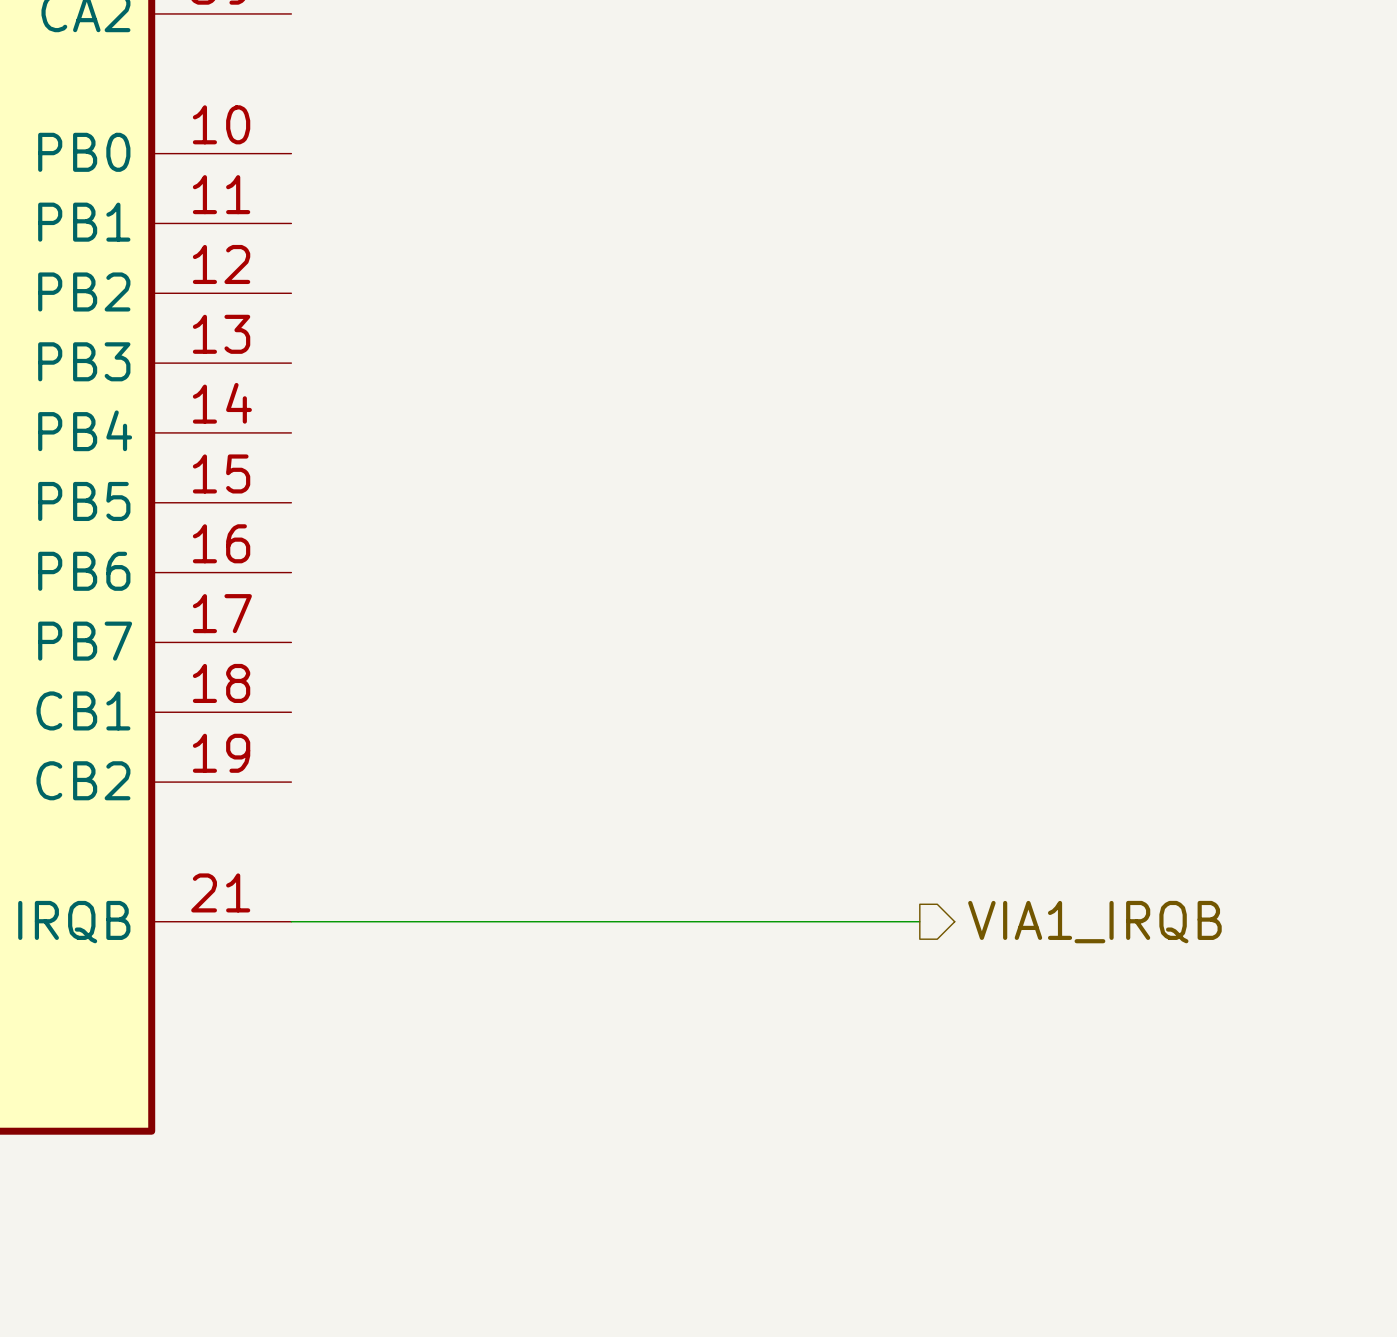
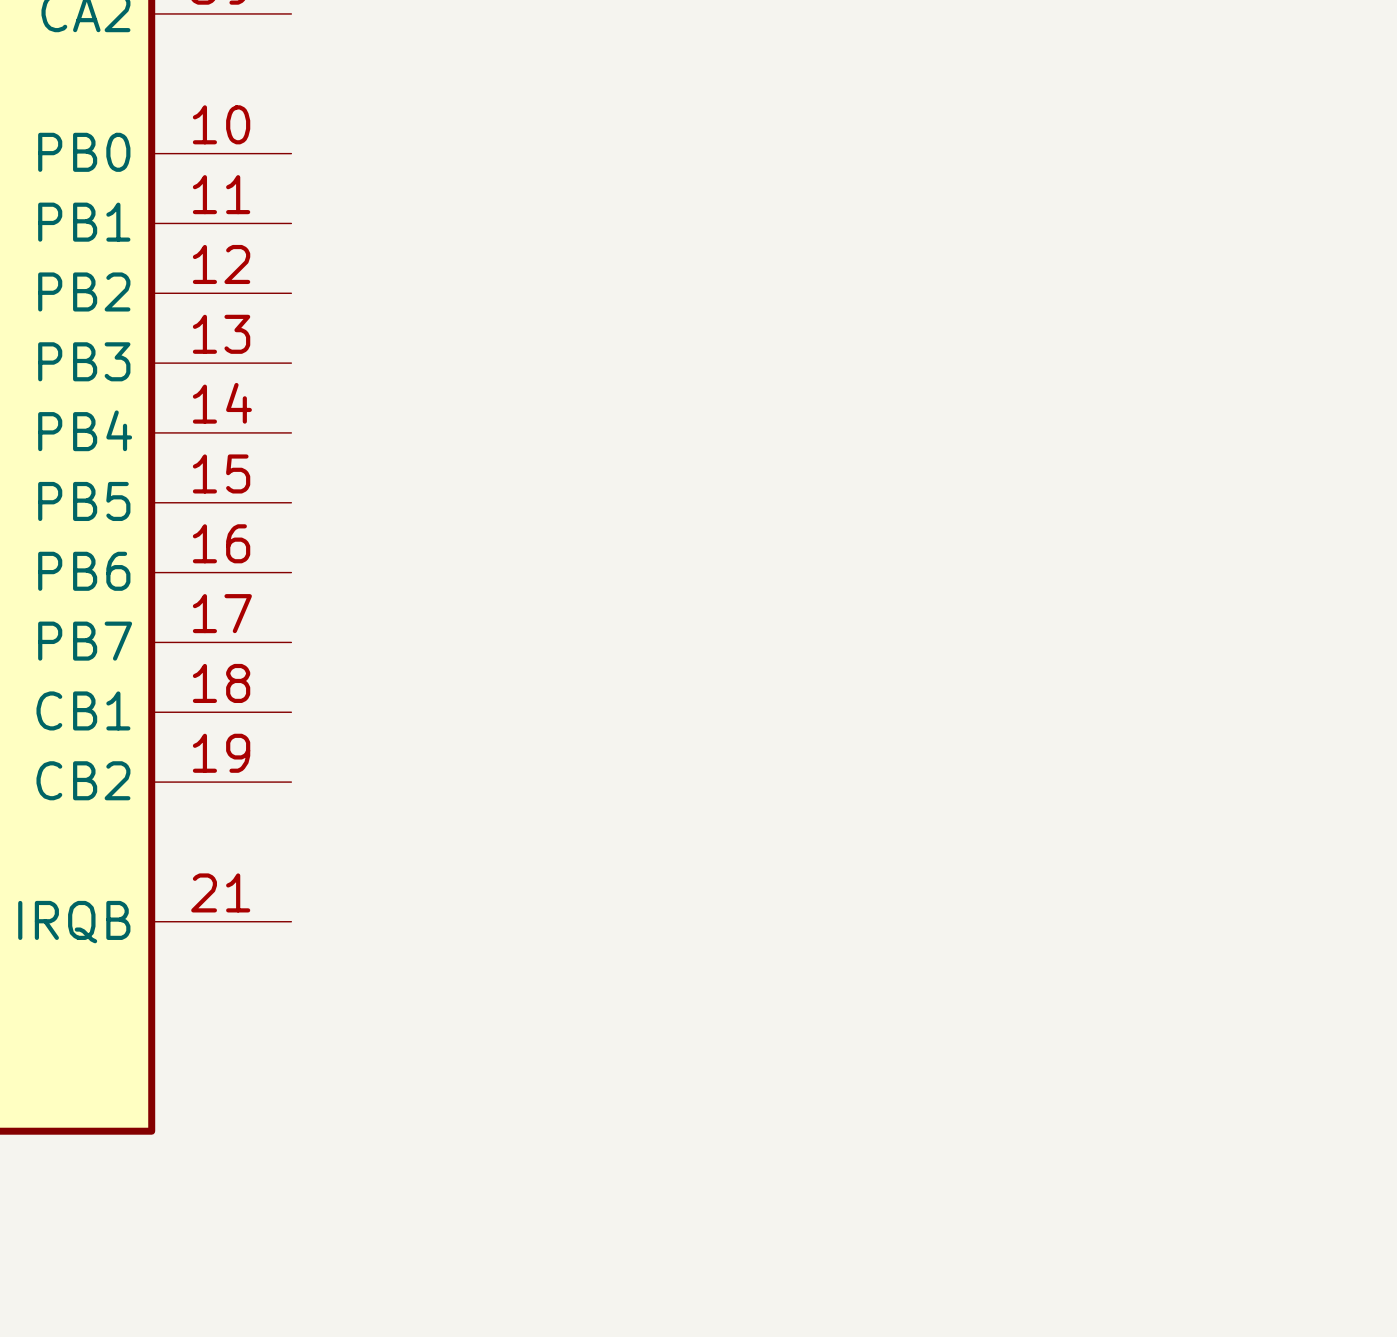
wire: (291, 921) (919, 921) -> none
hierarchical label: VIA1_IRQB (1094, 922) -> none

